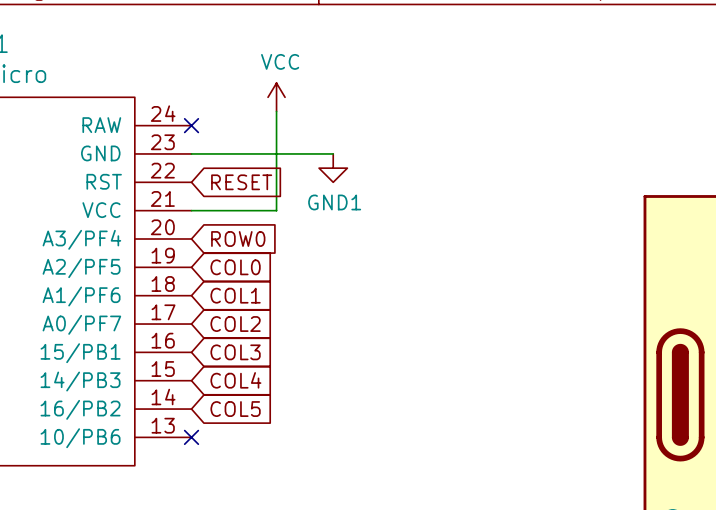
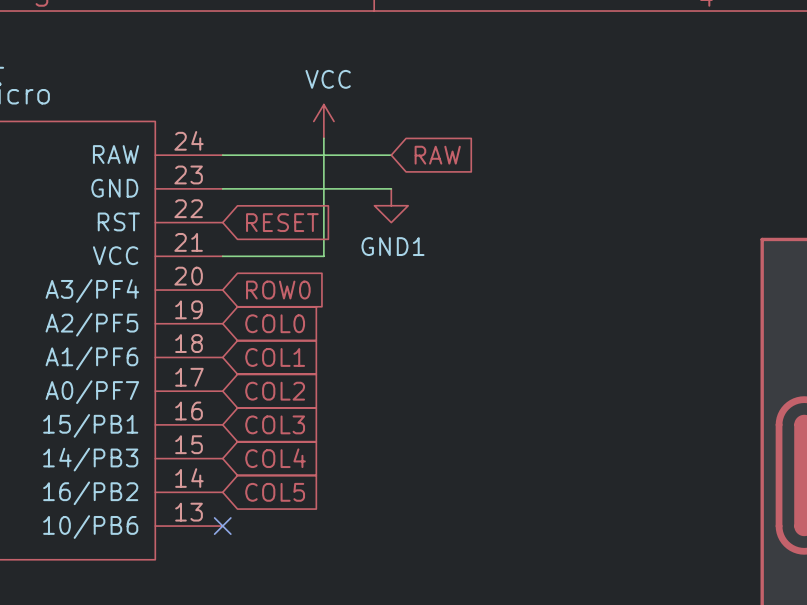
wire: none -> (222, 155) (391, 155)
no-connect mark: (191, 125) -> none
global label: none -> RAW (437, 155)

